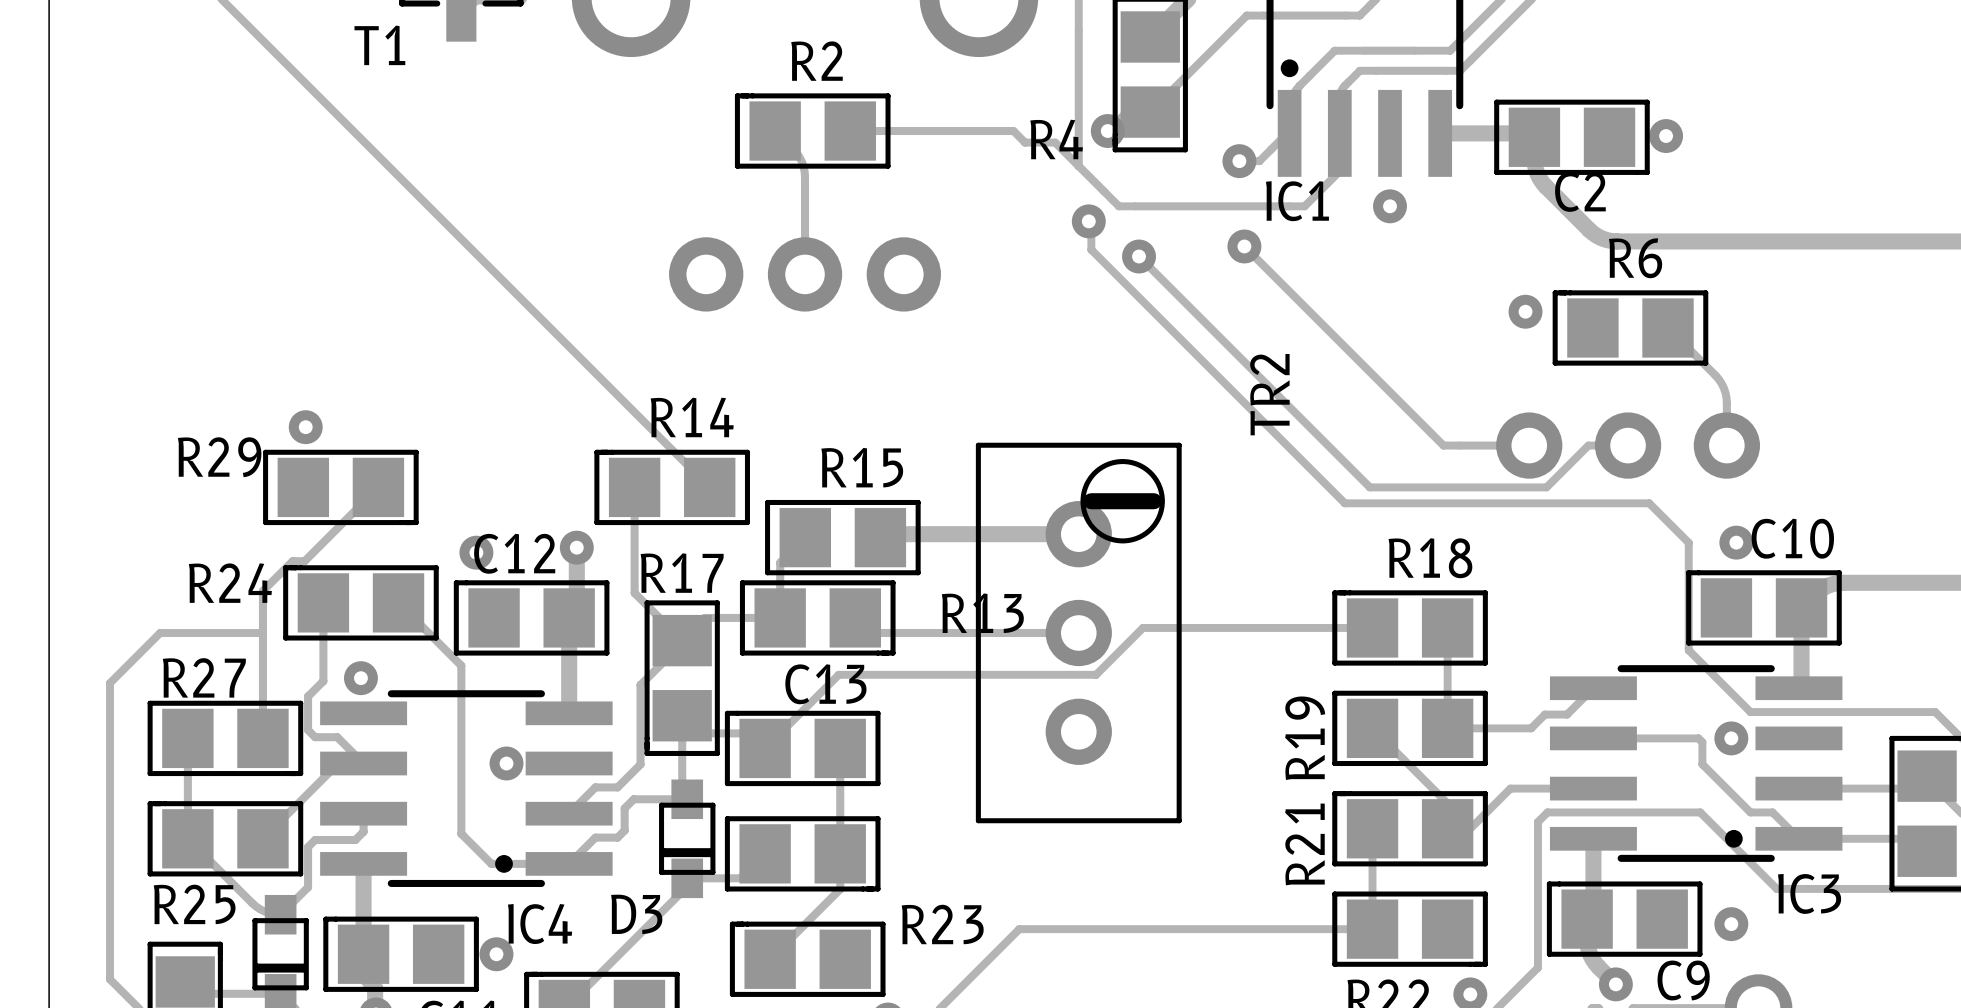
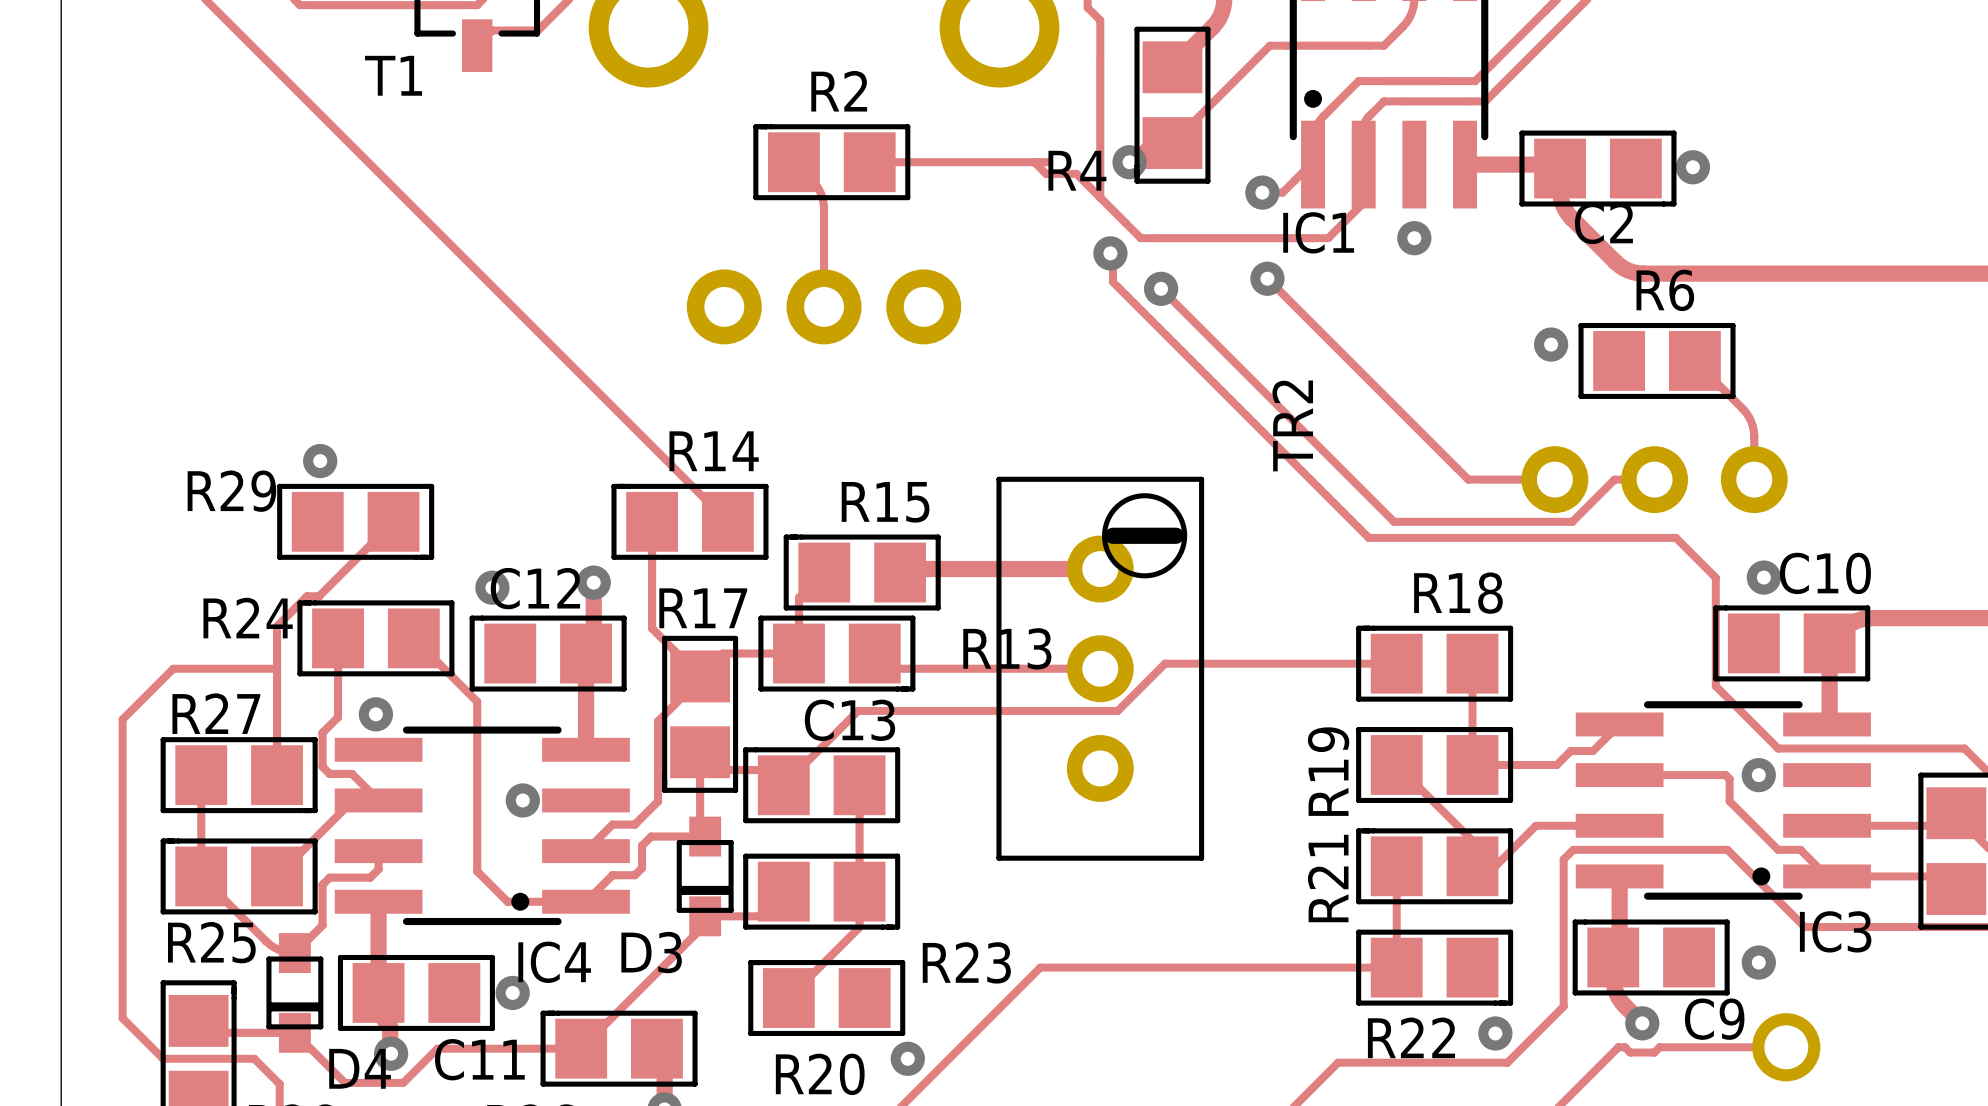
track: none -> (1034, 162) (1048, 162)

